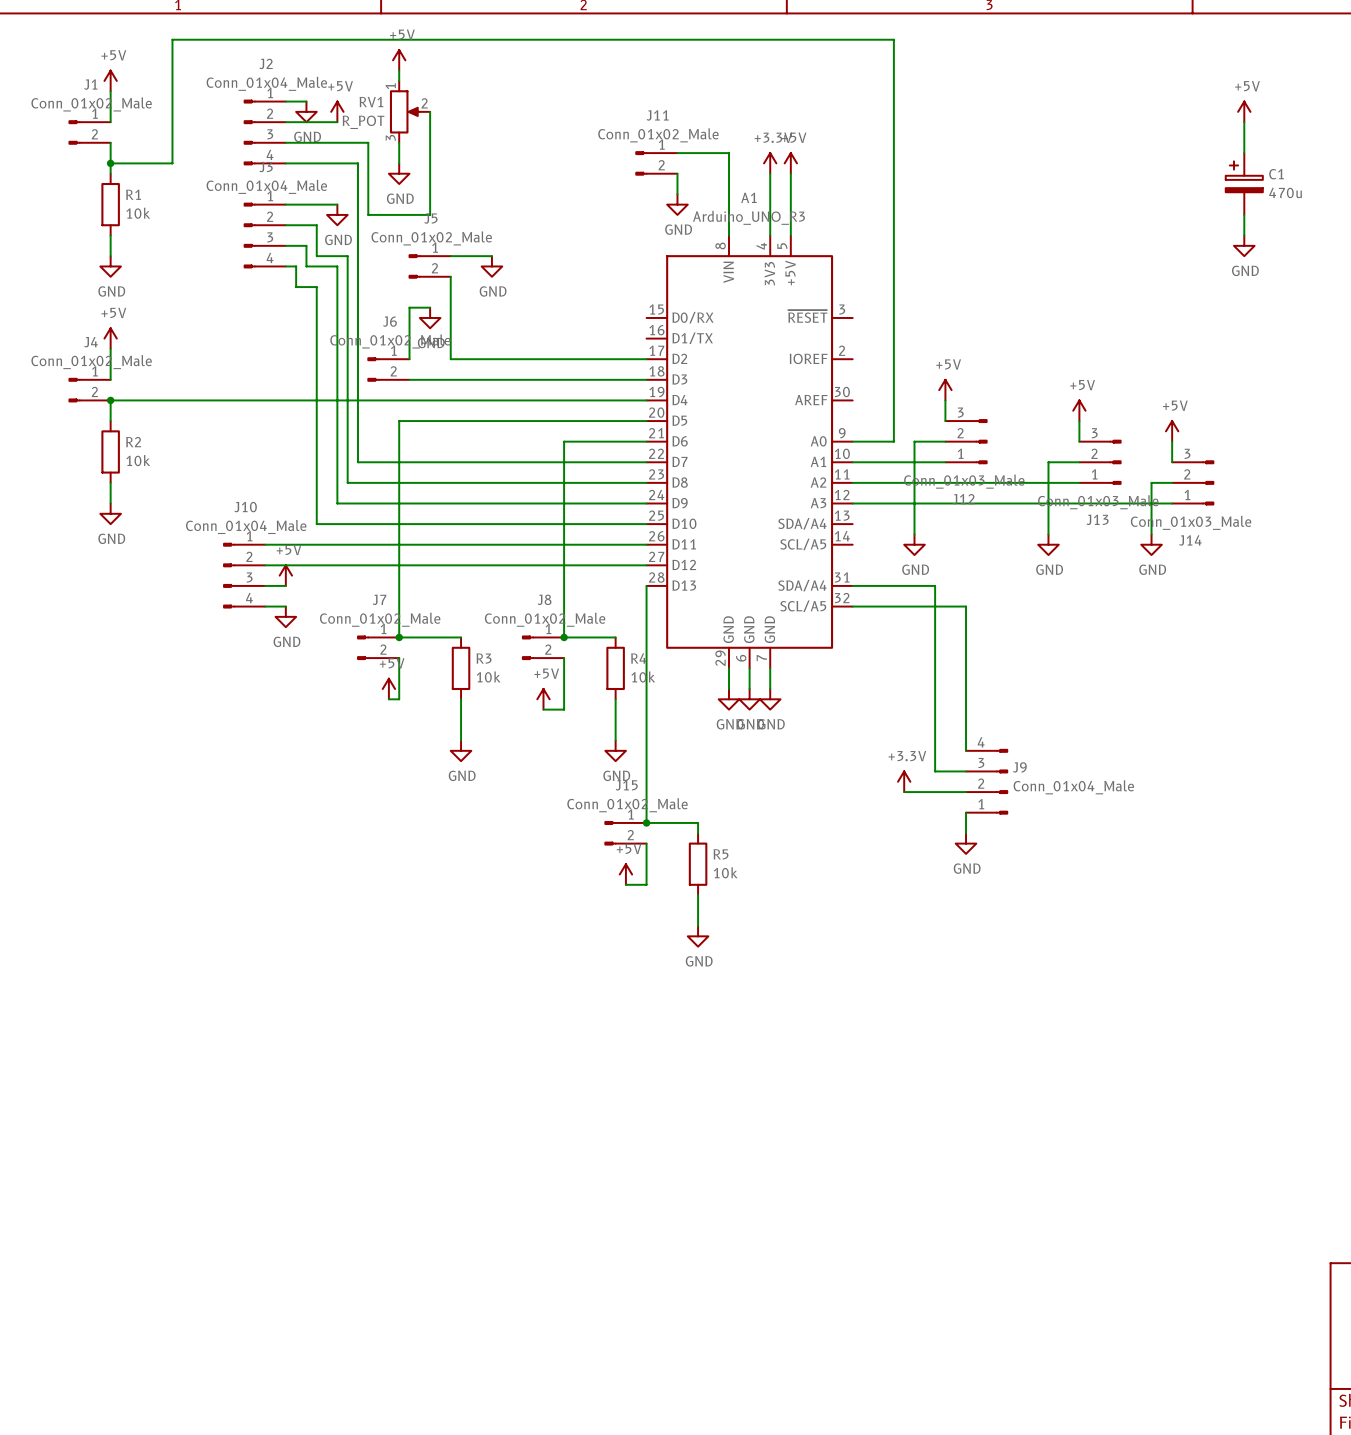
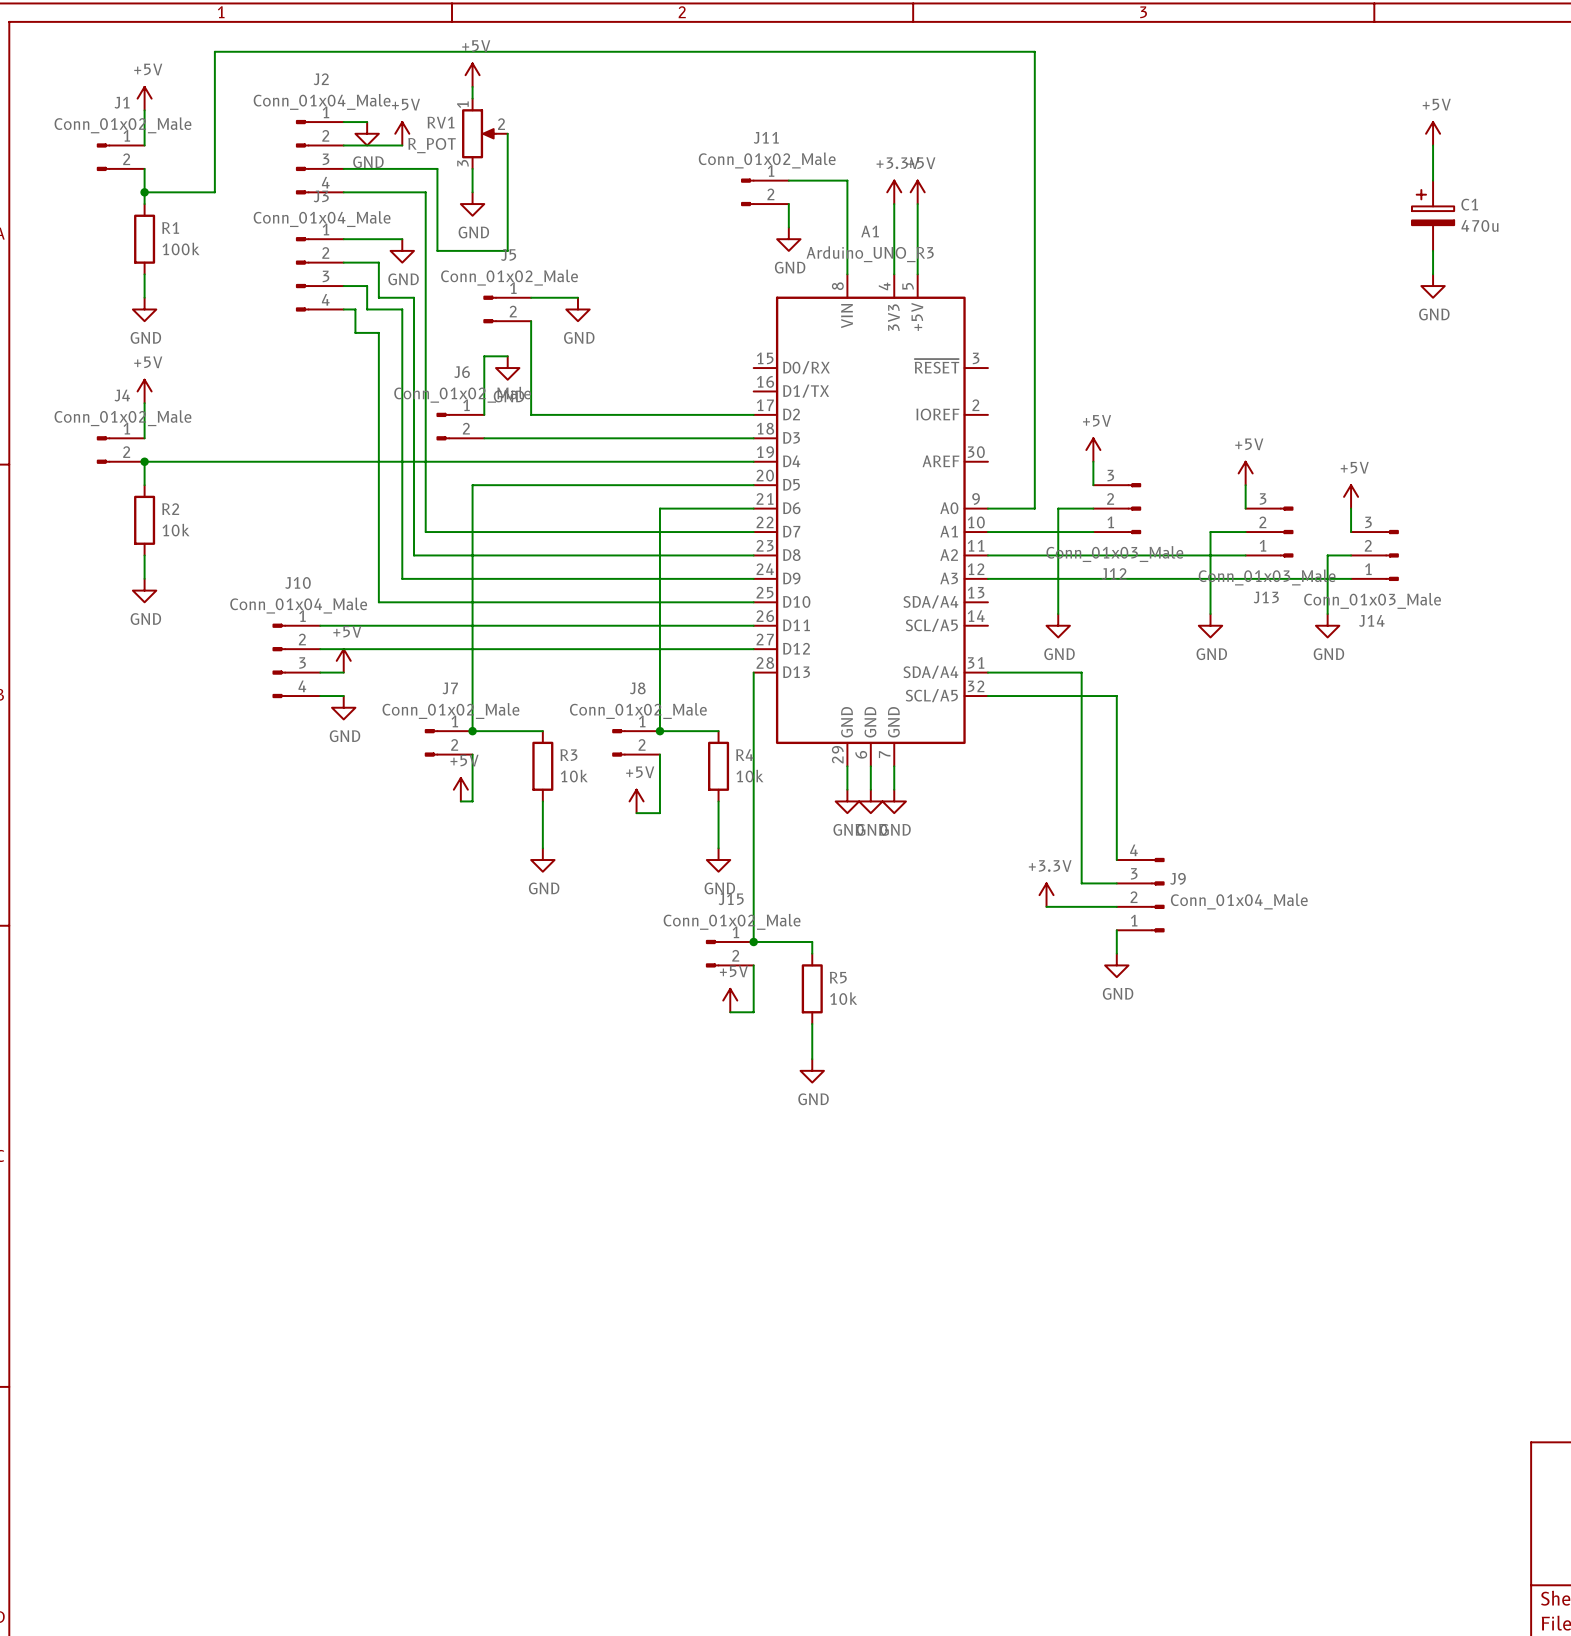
R1 value: 10k (138, 213) -> 100k (181, 248)

